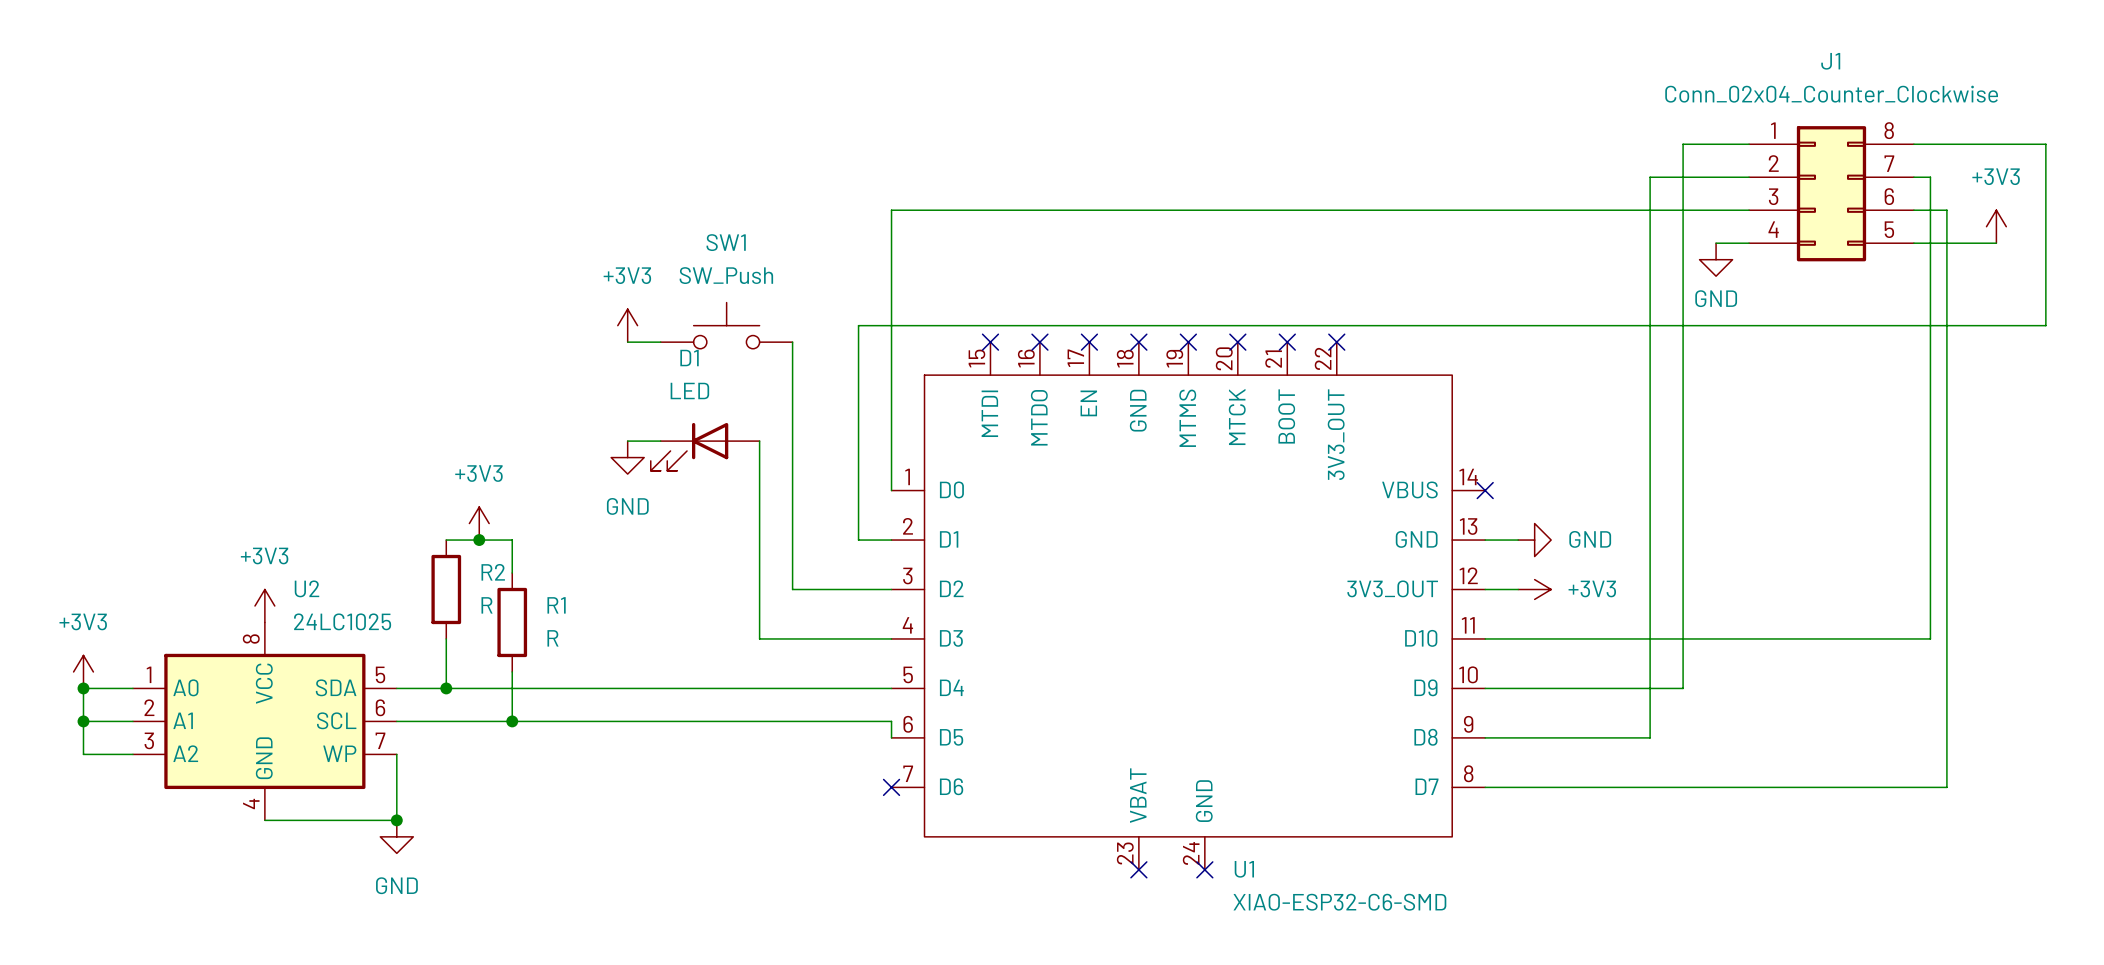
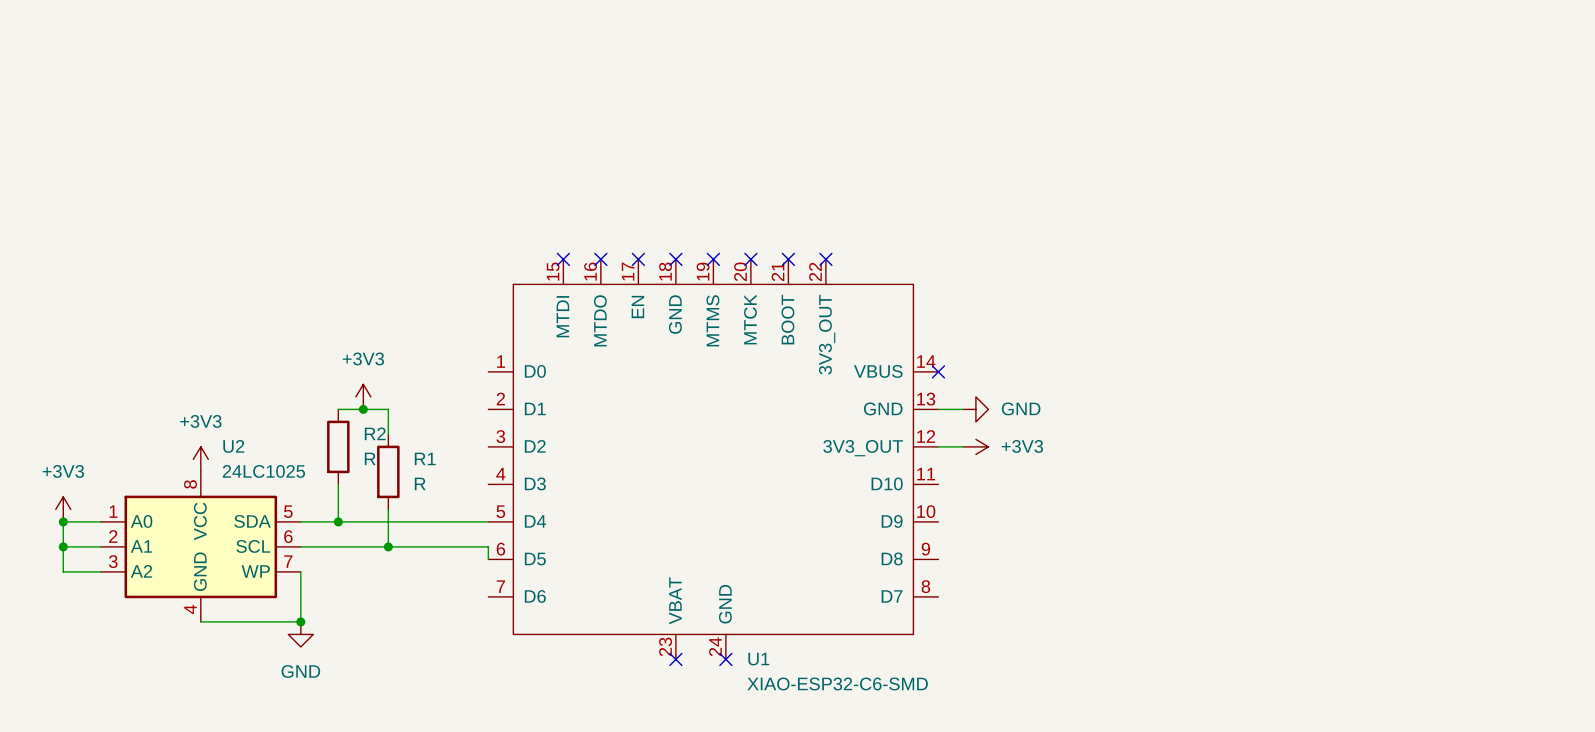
wire: (1749, 144) (1683, 144) (1683, 688) (1485, 688) -> none
wire: (1913, 144) (2045, 144) (2045, 325) (858, 325) (858, 540) (891, 540) -> none
wire: (1749, 177) (1650, 177) (1650, 737) (1485, 737) -> none
wire: (1913, 177) (1930, 177) (1930, 638) (1485, 638) -> none
J1: Conn_02x04_Counter_Clockwise (1831, 193) -> none
wire: (1749, 210) (891, 210) (891, 490) -> none
wire: (1913, 210) (1946, 210) (1946, 787) (1485, 787) -> none
power symbol: +3V3 (1996, 226) -> none
wire: (1716, 243) (1749, 243) -> none
wire: (1913, 243) (1996, 243) -> none
power symbol: GND (1716, 259) -> none
power symbol: +3V3 (627, 325) -> none
SW1: SW_Push (726, 325) -> none
wire: (627, 342) (660, 342) -> none
no-connect mark: none -> (563, 259)
wire: (792, 342) (792, 589) (891, 589) -> none
no-connect mark: none -> (600, 259)
no-connect mark: none -> (638, 259)
no-connect mark: none -> (675, 259)
no-connect mark: none -> (713, 259)
no-connect mark: (1138, 342) -> none
no-connect mark: (1188, 342) -> none
no-connect mark: (1237, 342) -> none
no-connect mark: (1287, 342) -> none
no-connect mark: (1336, 342) -> none
wire: (627, 441) (660, 441) -> none
wire: (759, 441) (759, 638) (891, 638) -> none
D1: LED (705, 446) -> none
power symbol: GND (627, 457) -> none
no-connect mark: none -> (938, 371)
no-connect mark: (1485, 490) -> none
wire: (1485, 540) (1518, 540) -> (938, 409) (963, 409)
power symbol position: GND (1534, 540) -> GND (975, 409)
wire: (1485, 589) (1518, 589) -> (938, 446) (963, 446)
power symbol position: +3V3 (1534, 589) -> +3V3 (975, 446)
U1 position: (1188, 605) -> (713, 459)
wire: (644, 688) (891, 688) -> none
wire: (644, 721) (891, 721) (891, 737) -> (488, 546) (488, 559)
no-connect mark: (891, 787) -> none
no-connect mark: none -> (675, 659)
no-connect mark: none -> (725, 659)
no-connect mark: (1138, 869) -> none
no-connect mark: (1204, 869) -> none

